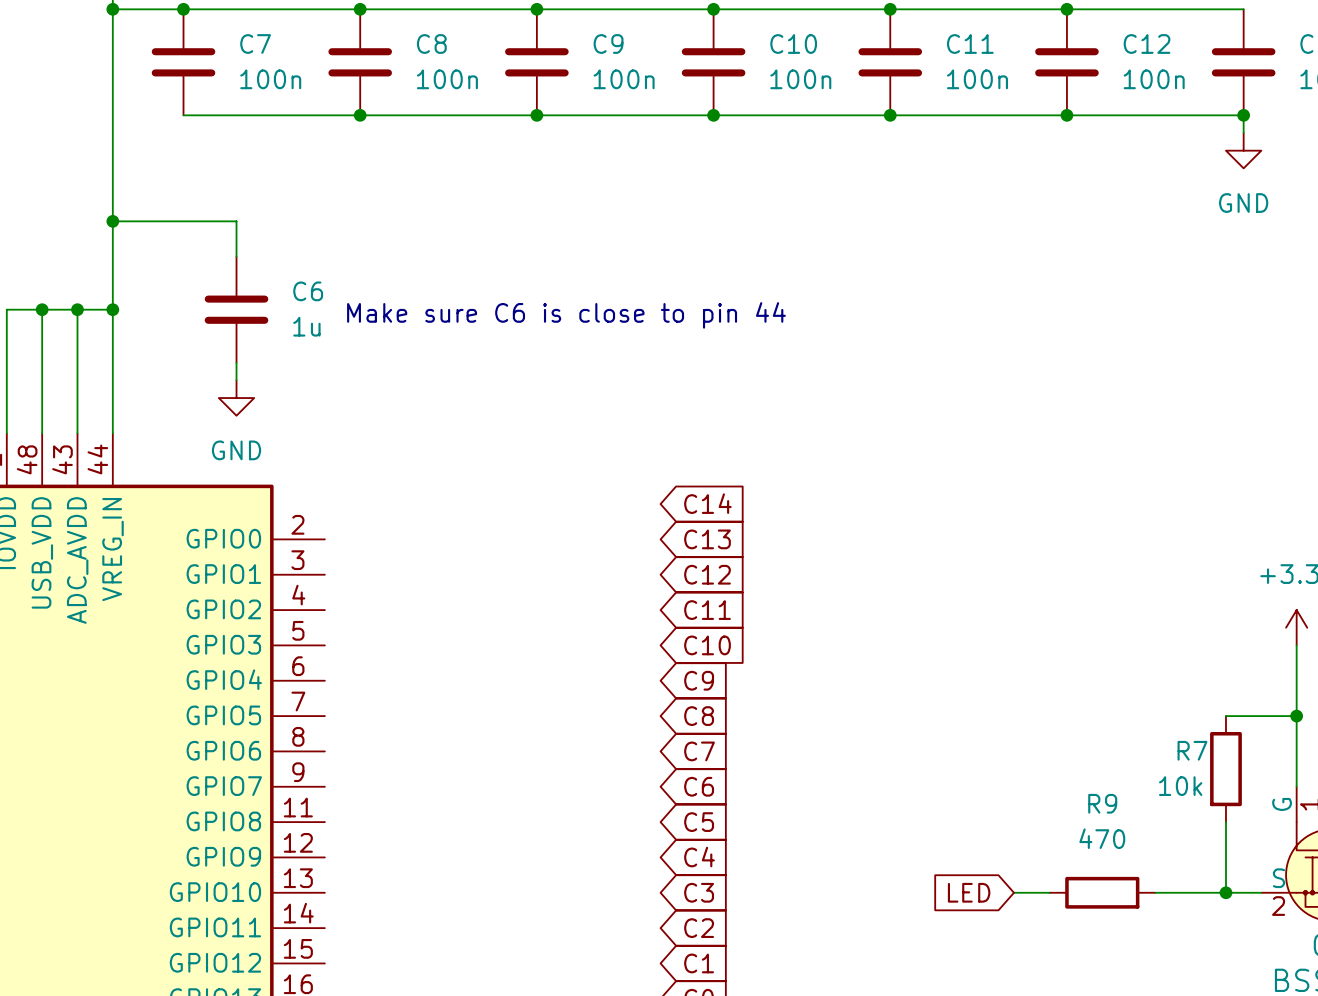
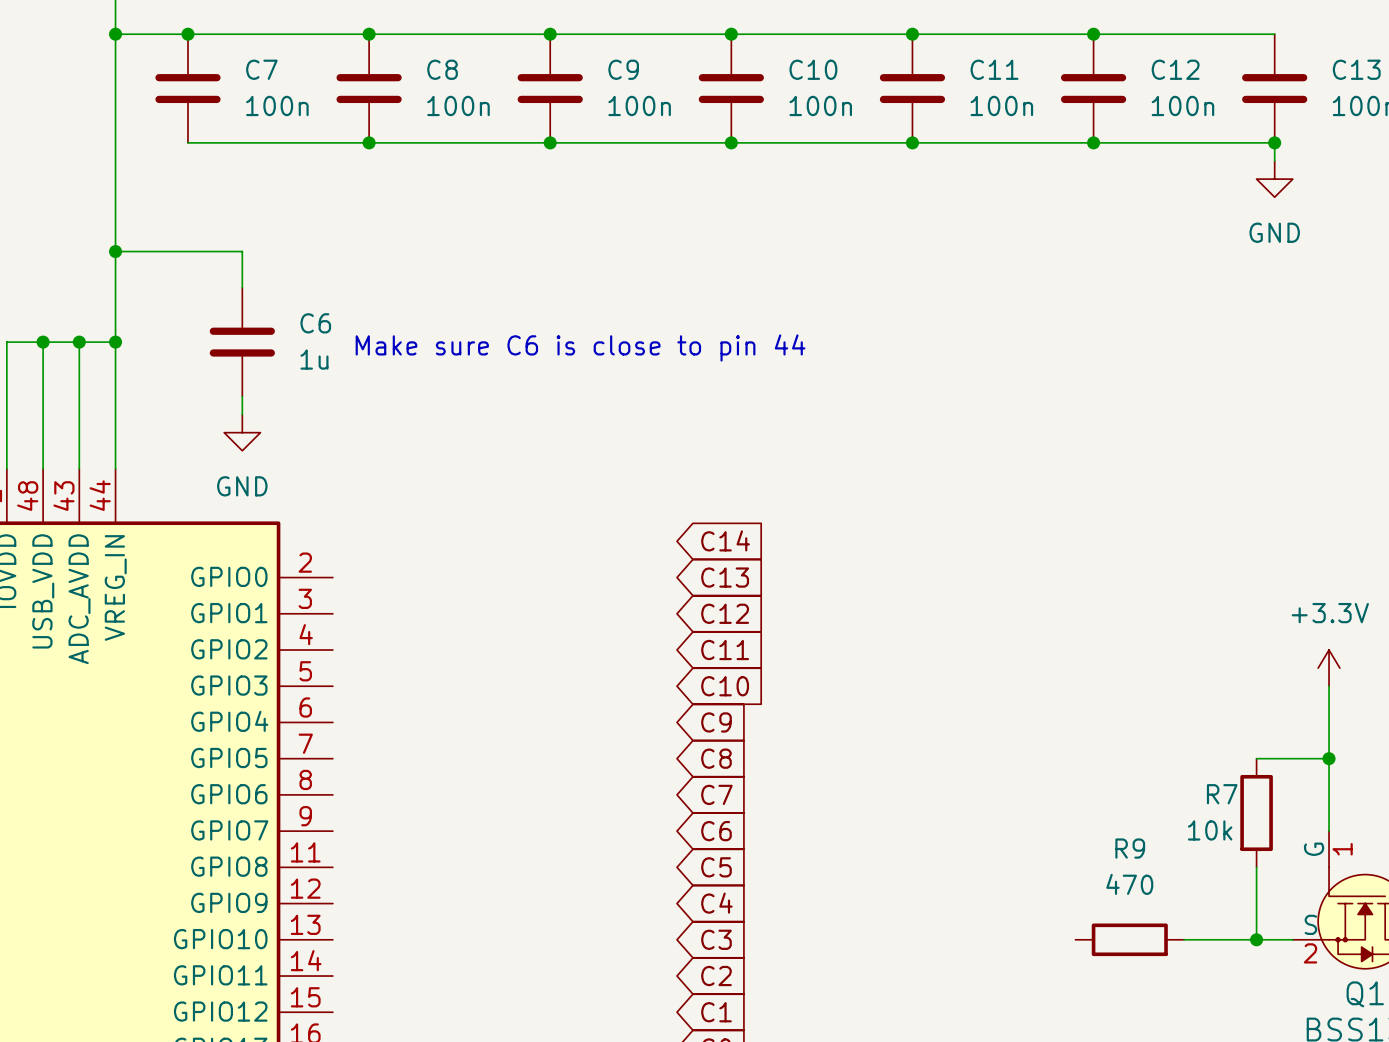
global label: LED (969, 892) -> none
wire: (1013, 892) (1049, 892) -> none

